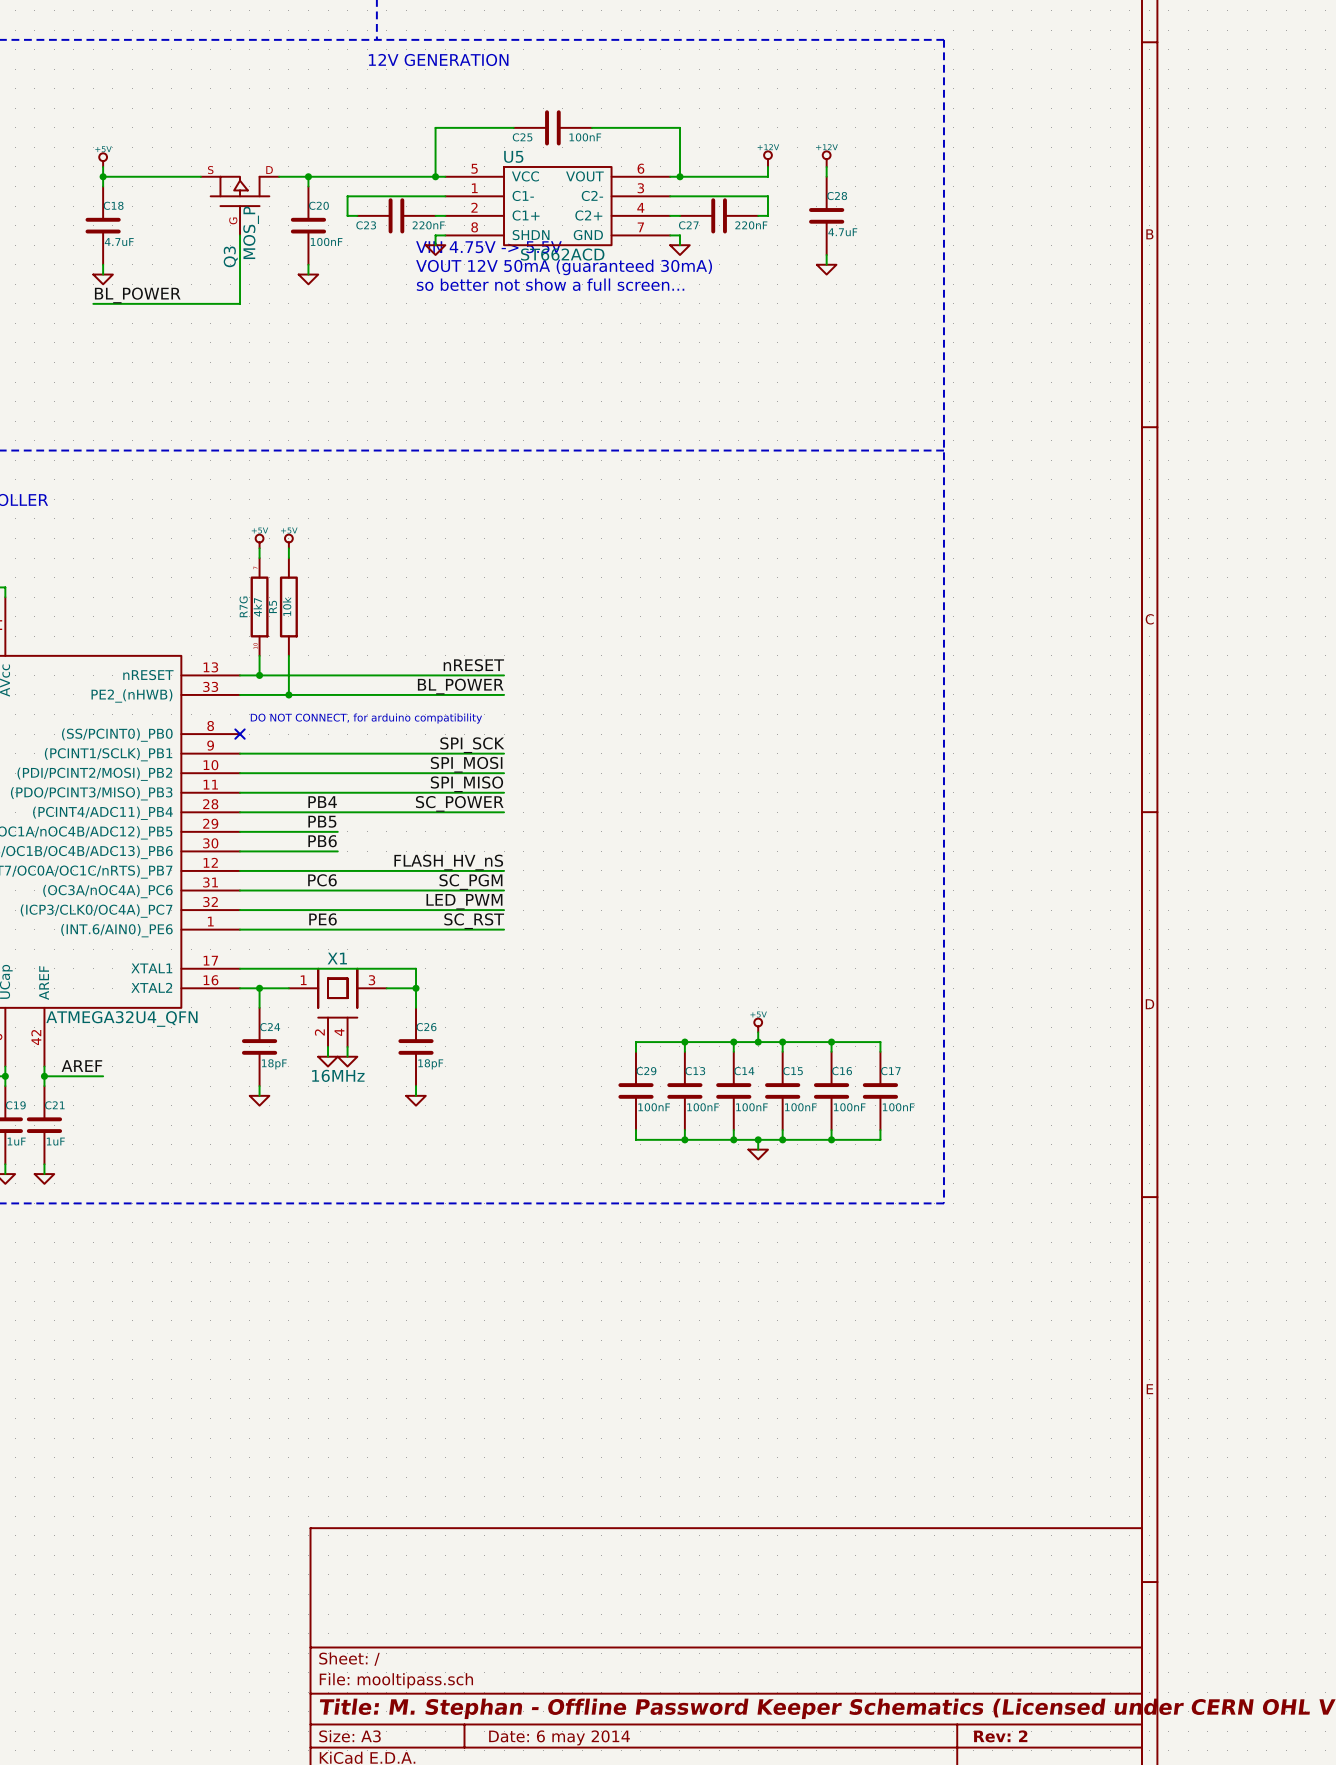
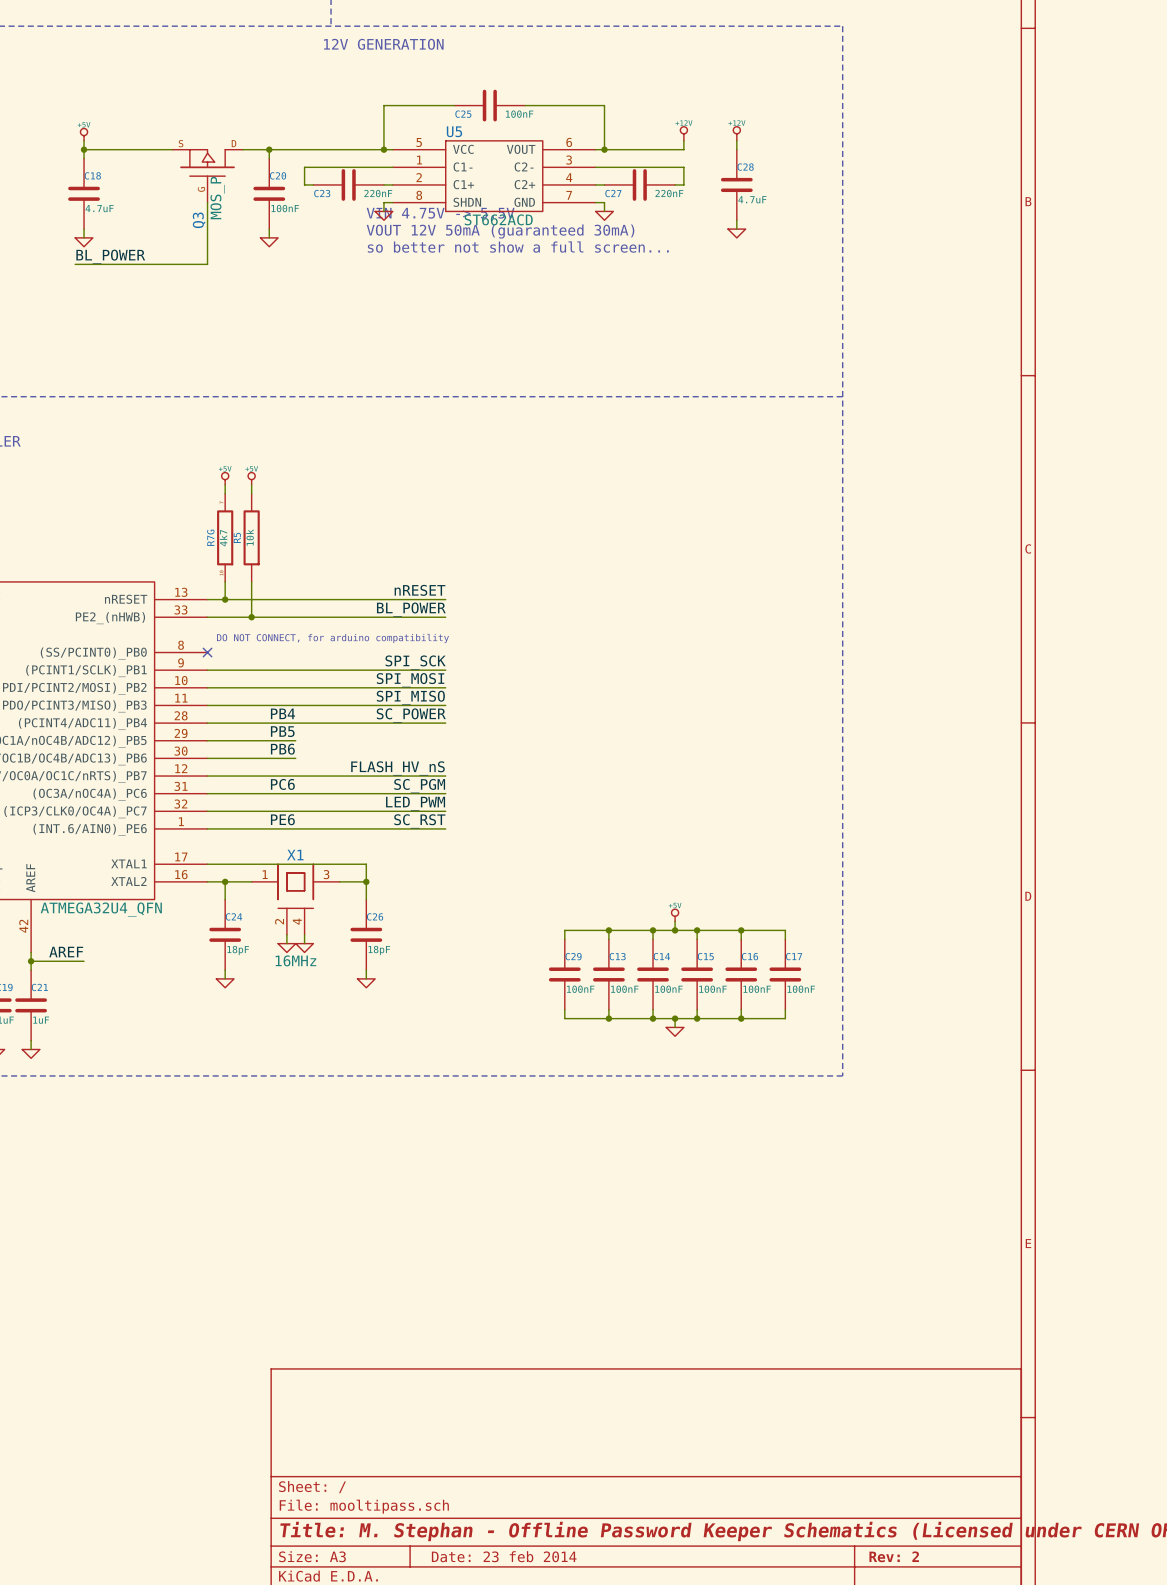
title block: Date: 6 may 2014 (559, 1737) -> Date: 23 feb 2014 (504, 1556)

